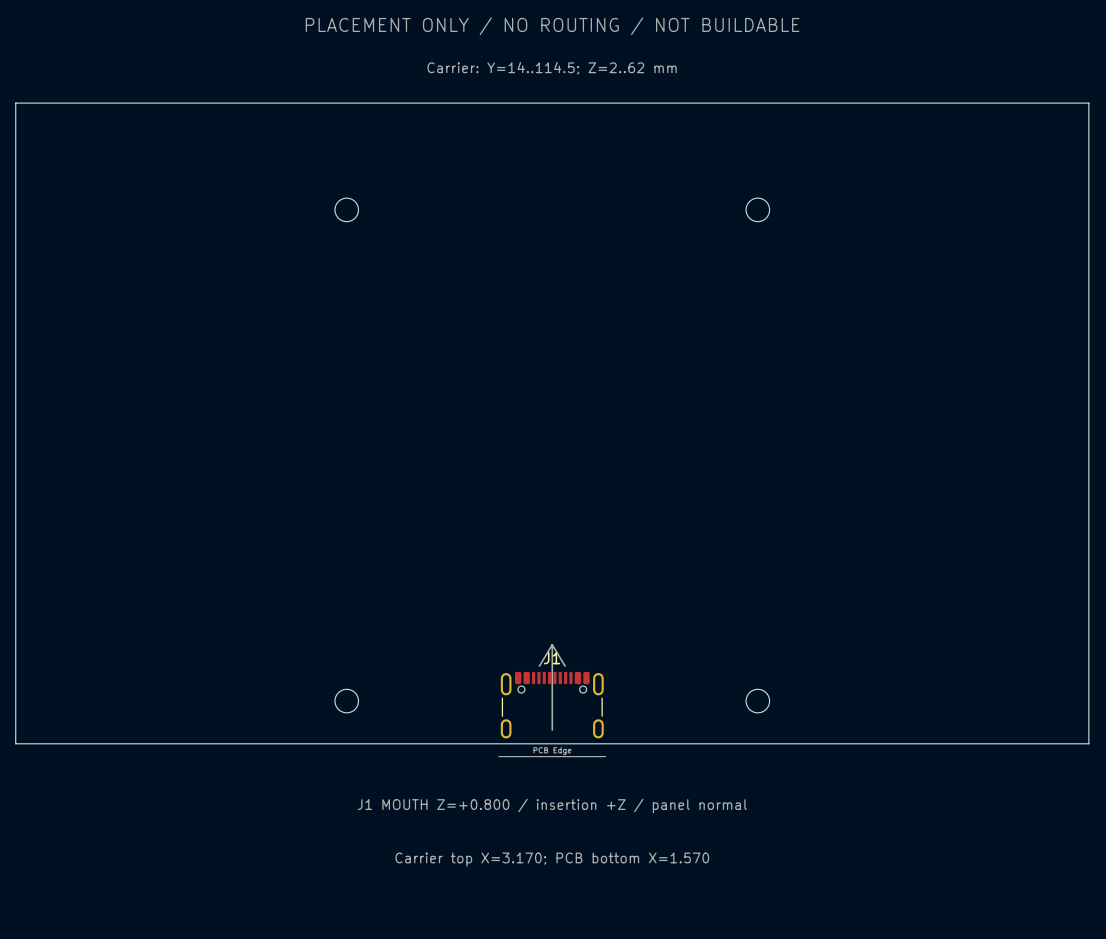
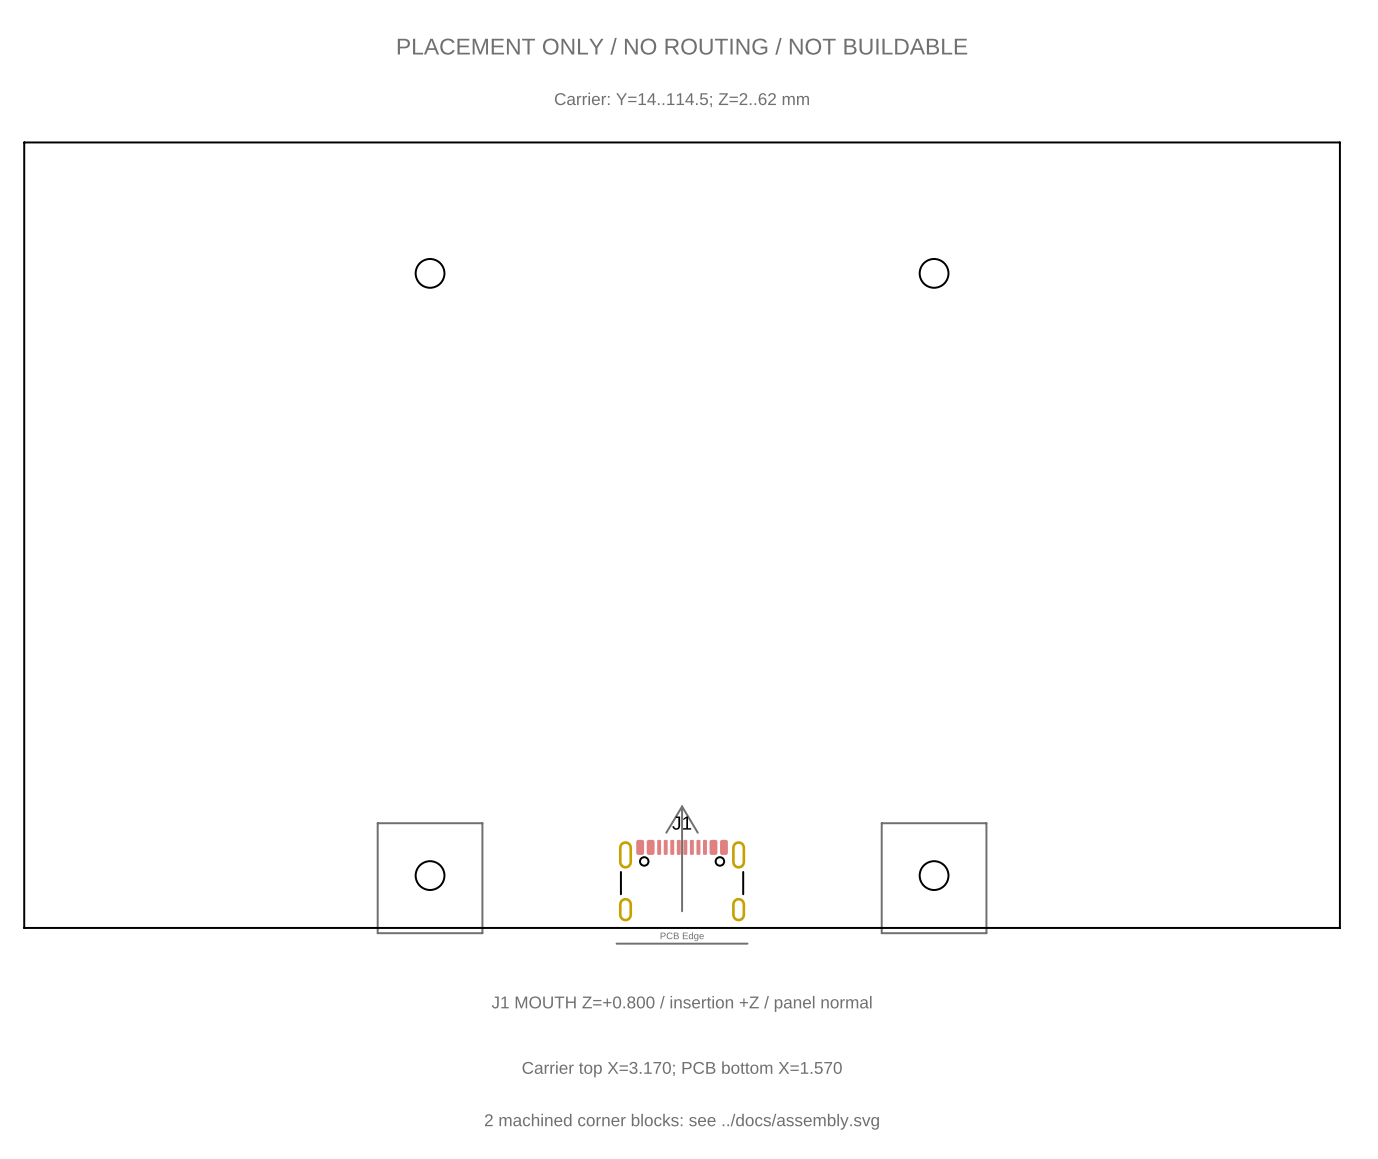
line: none -> (377, 823) (377, 933) (482, 933) (482, 823) (377, 823)
line: none -> (881, 823) (986, 823) (986, 933) (881, 933) (881, 823)
text: none -> 2 machined corner blocks: see ../docs/assembly.svg (681, 1121)

